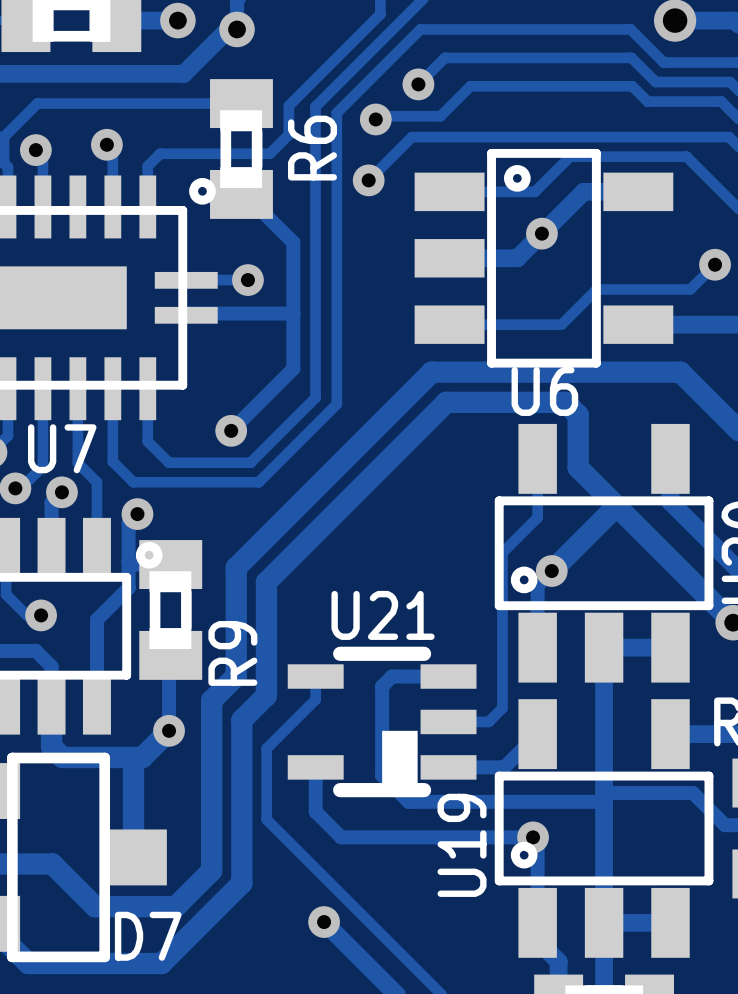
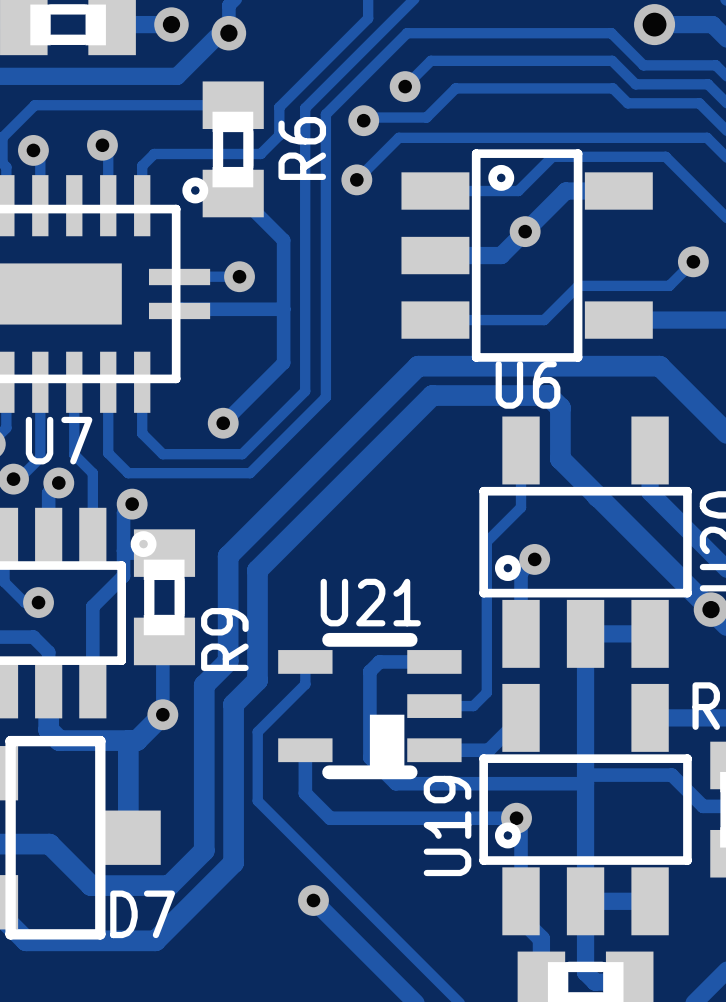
track: (616, 506) (551, 571) -> none

